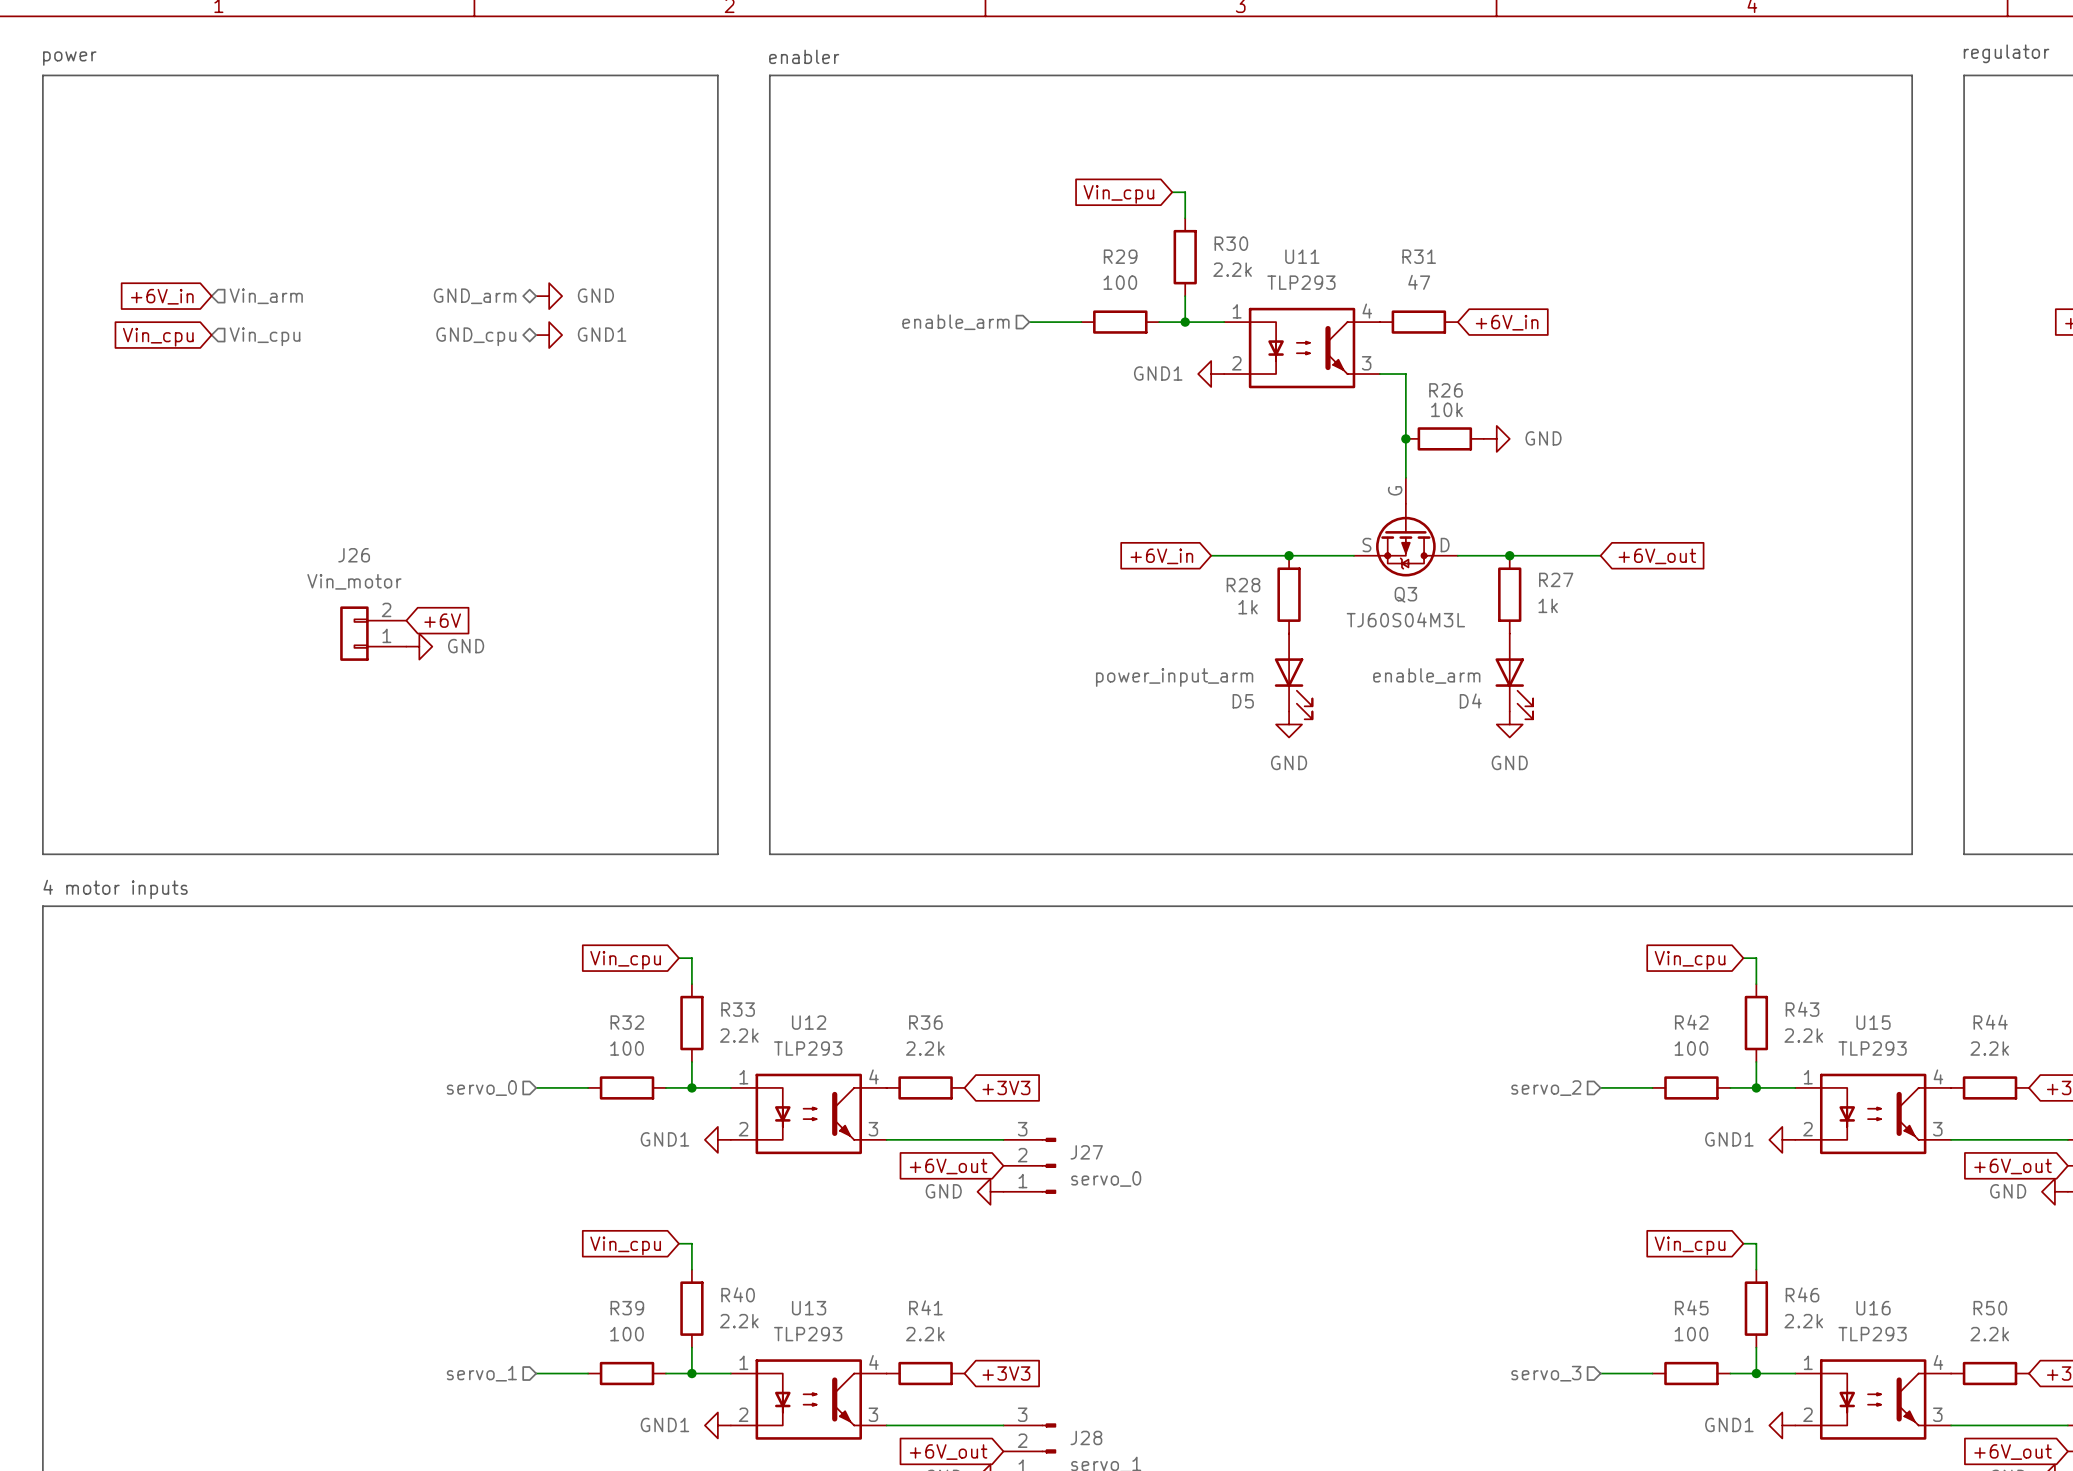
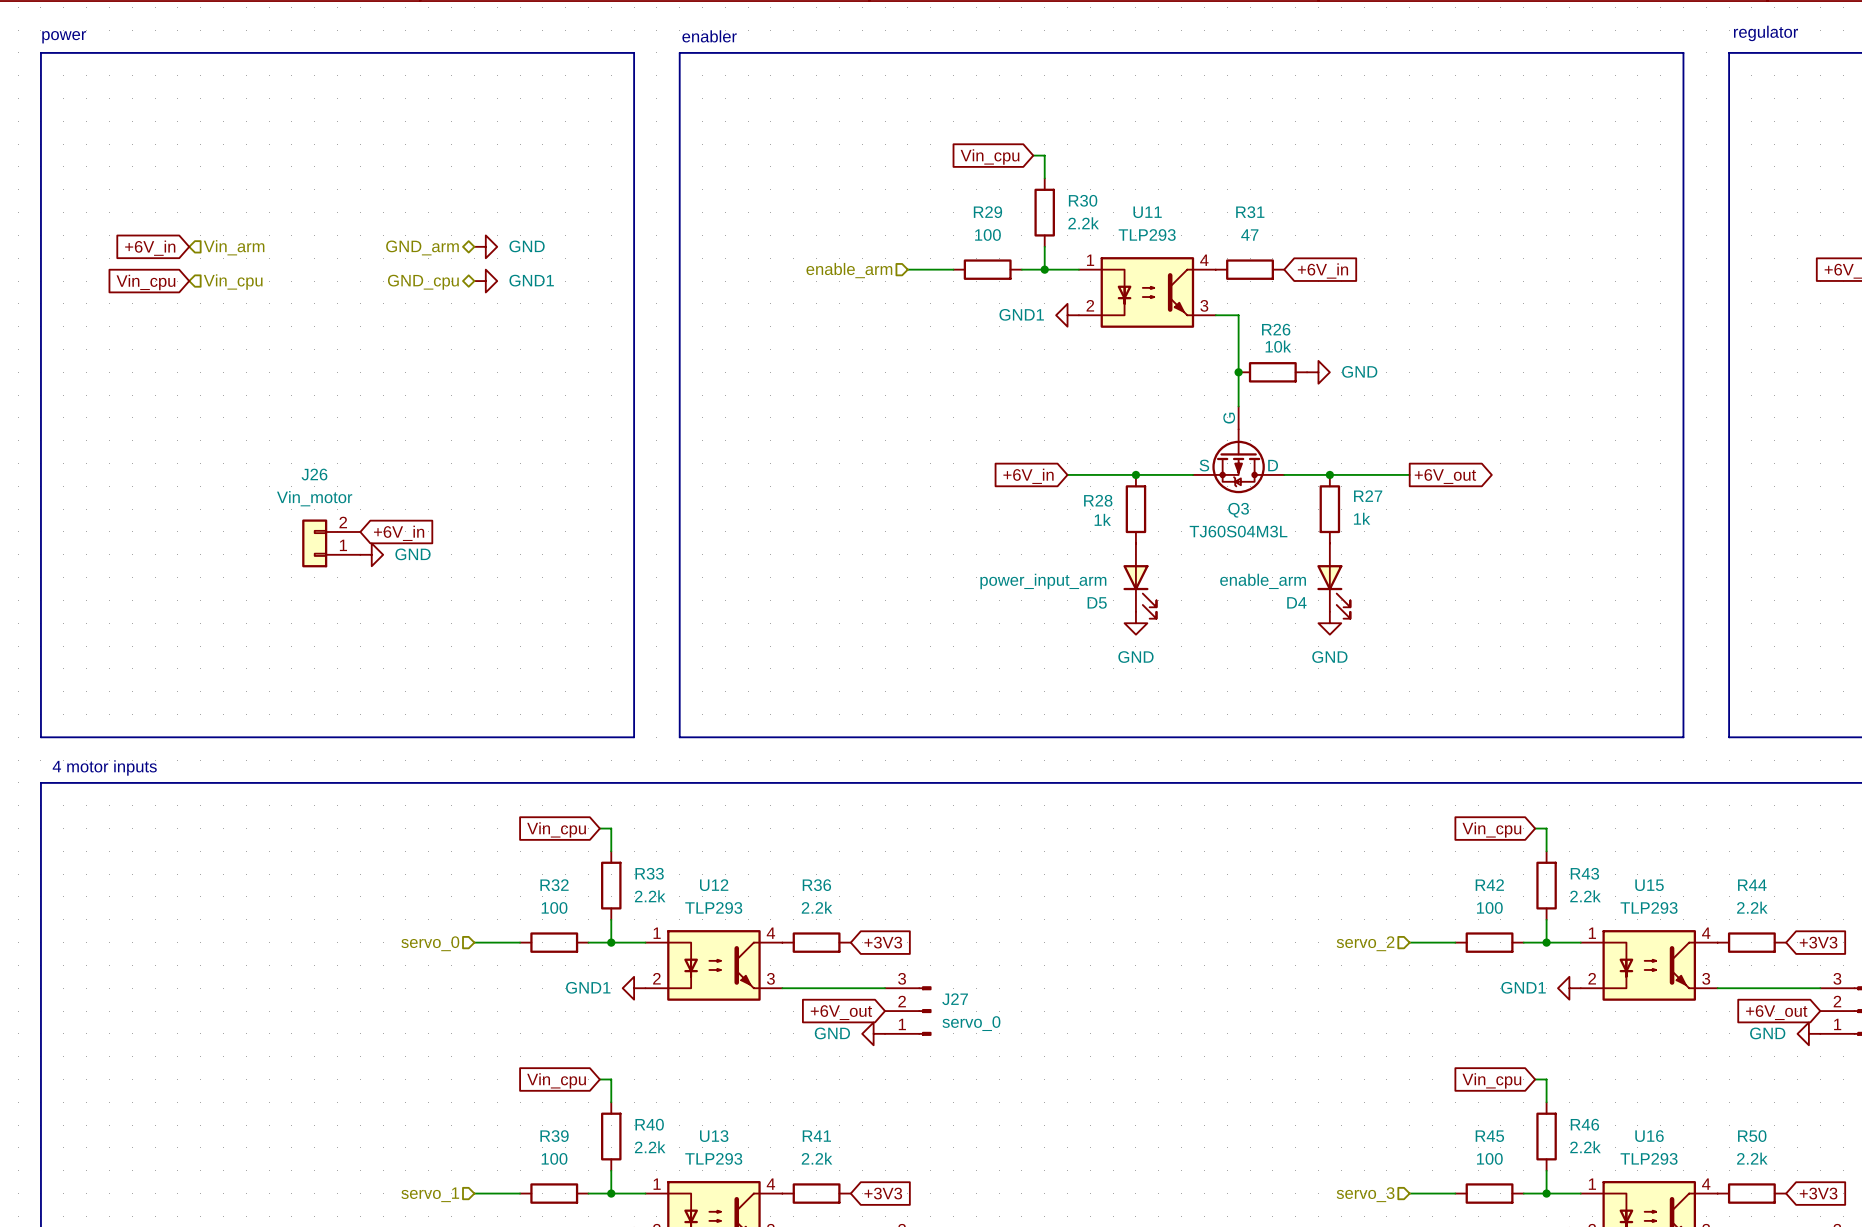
global label shape: input (1657, 556) -> output (1445, 476)
global label: +6V (442, 620) -> +6V_in (399, 533)

